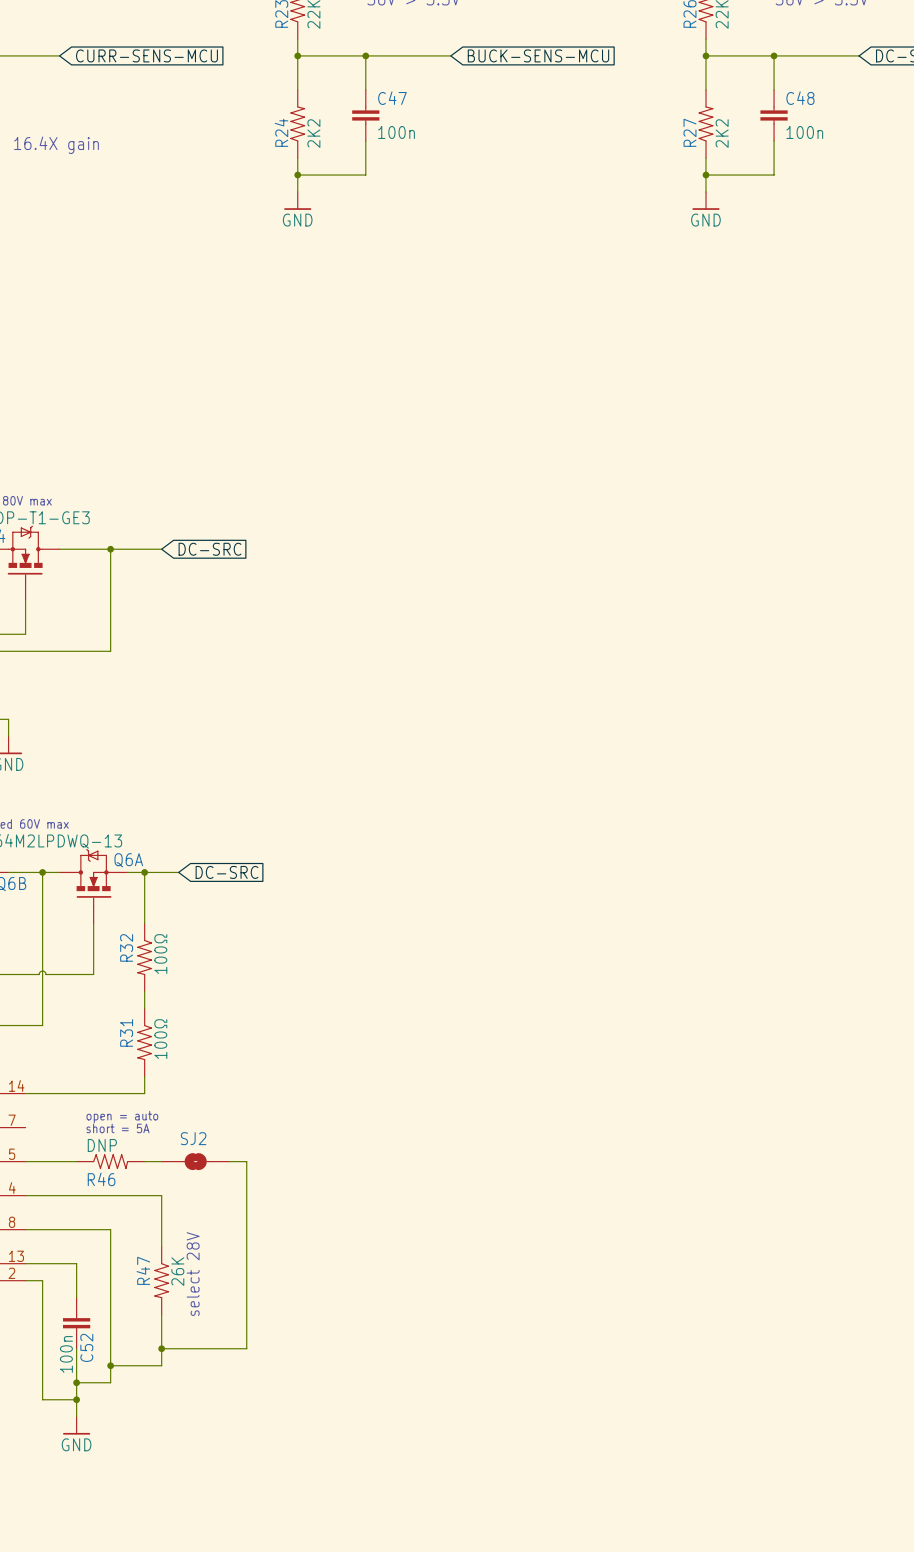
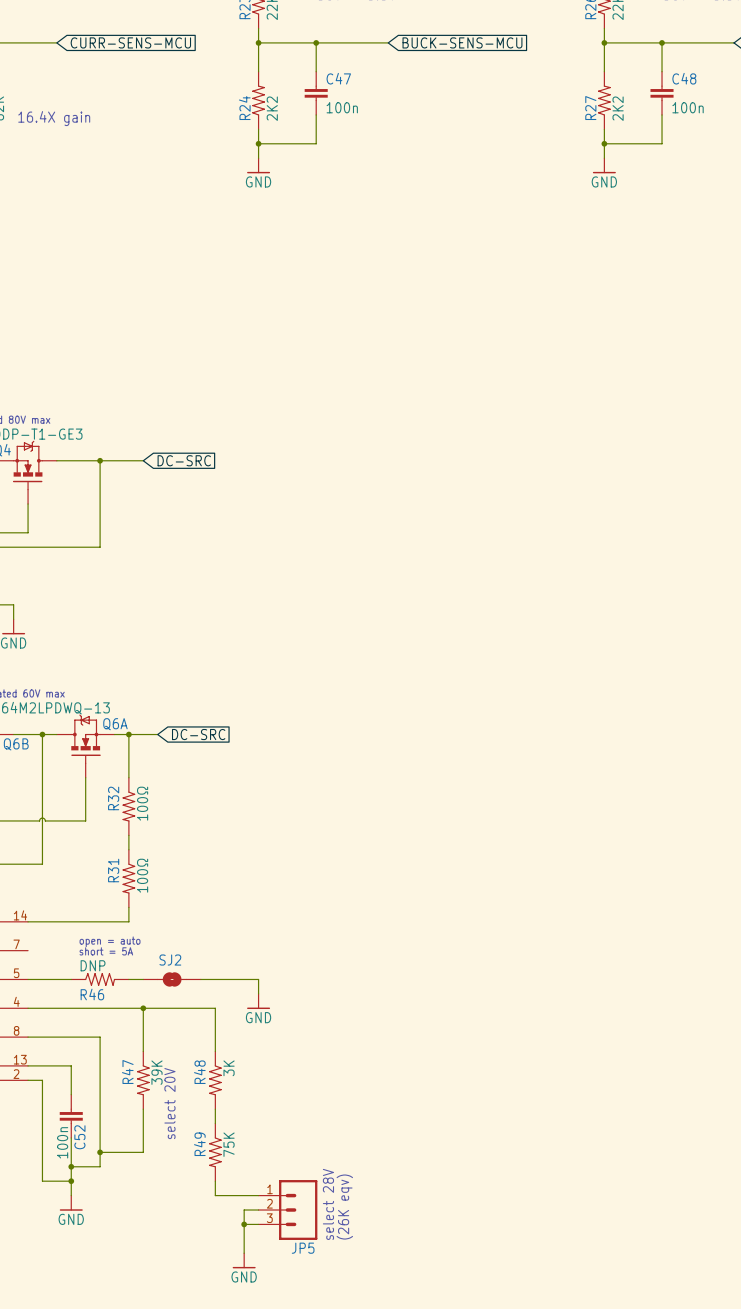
wire: (246, 1161) (246, 1195) -> (215, 979) (258, 979) (258, 993)
power symbol: none -> GND (258, 1001)
wire: none -> (143, 1008) (215, 1008)
junction: none -> (143, 1008)
R47 value: 26K (177, 1271) -> 39K (157, 1072)
text: select 28V (193, 1274) -> select 20V (169, 1103)
R48: none -> 3K (215, 1080)
wire: (246, 1331) (246, 1348) (161, 1348) -> none
junction: (161, 1348) -> none
R49: none -> 75K (215, 1152)
wire: none -> (215, 1181) (215, 1195) (258, 1195)
text: none -> select 28V (328, 1204)
text: none -> (26K eqv) (344, 1207)
wire: none -> (258, 1210) (244, 1210) (244, 1253)
JP5: none -> (287, 1210)
wire: none -> (244, 1224) (258, 1224)
junction: none -> (244, 1224)
power symbol: none -> GND (244, 1260)

